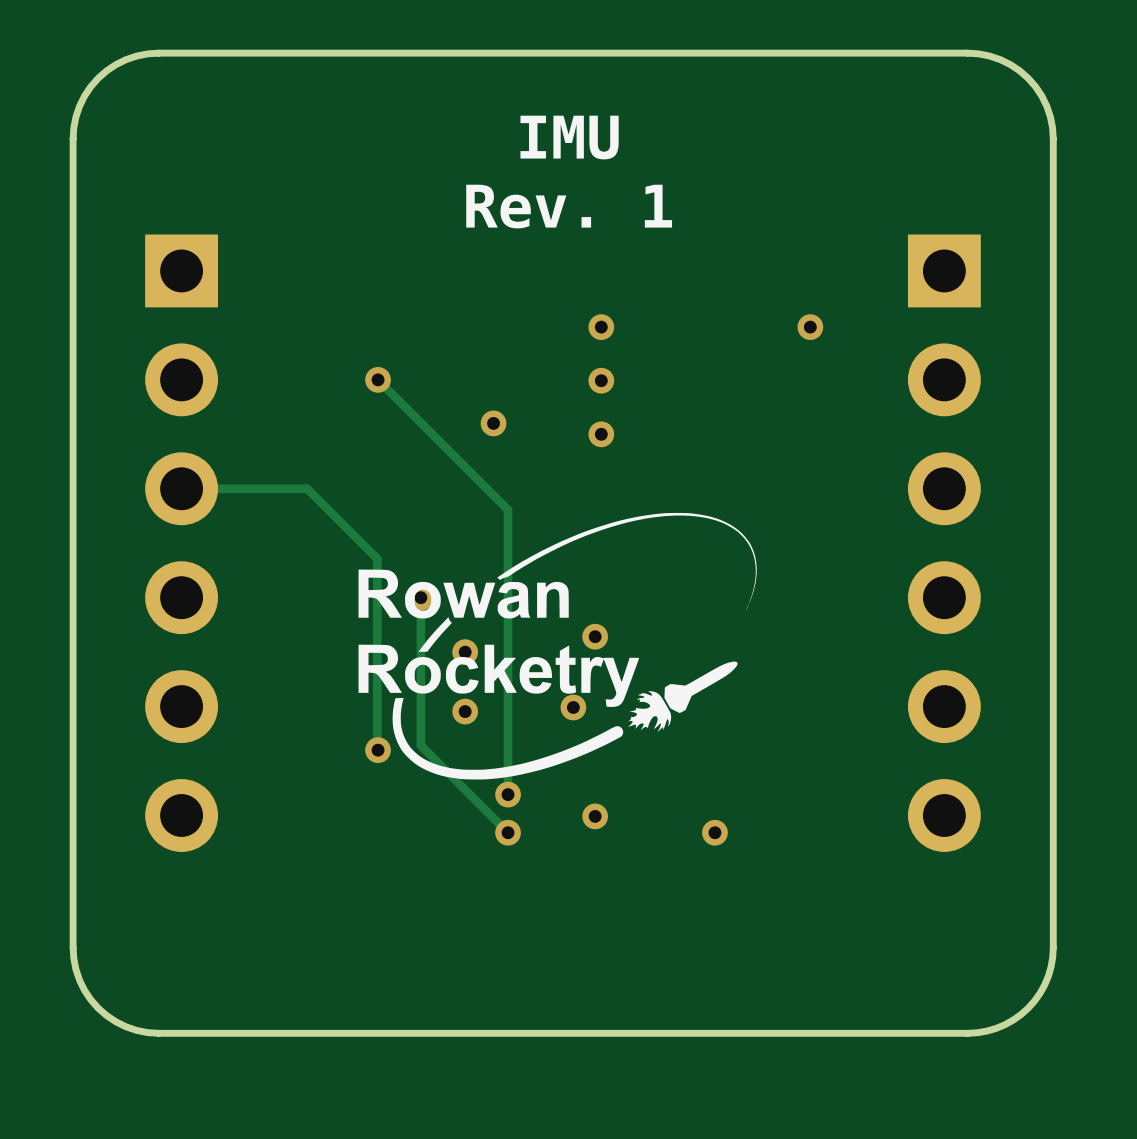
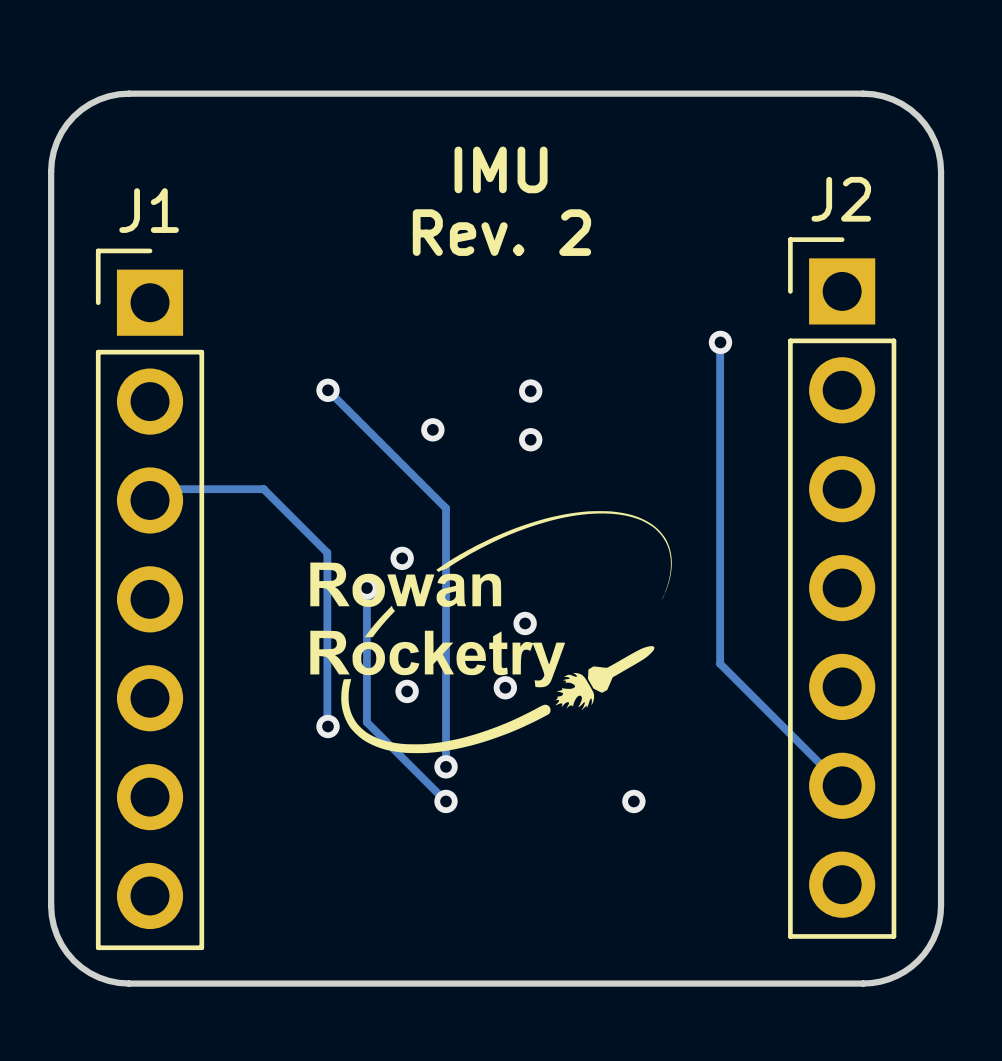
text: Rev. 1 (569, 206) -> Rev. 2 (501, 232)
via: (601, 327) -> none
track: none -> (720, 342) (720, 663) (842, 785)
part: (181, 543) -> none
part: (944, 543) -> none
J2: none -> (842, 588)
J1: none -> (150, 599)
via position: (465, 652) -> (402, 558)
via: (595, 816) -> none

